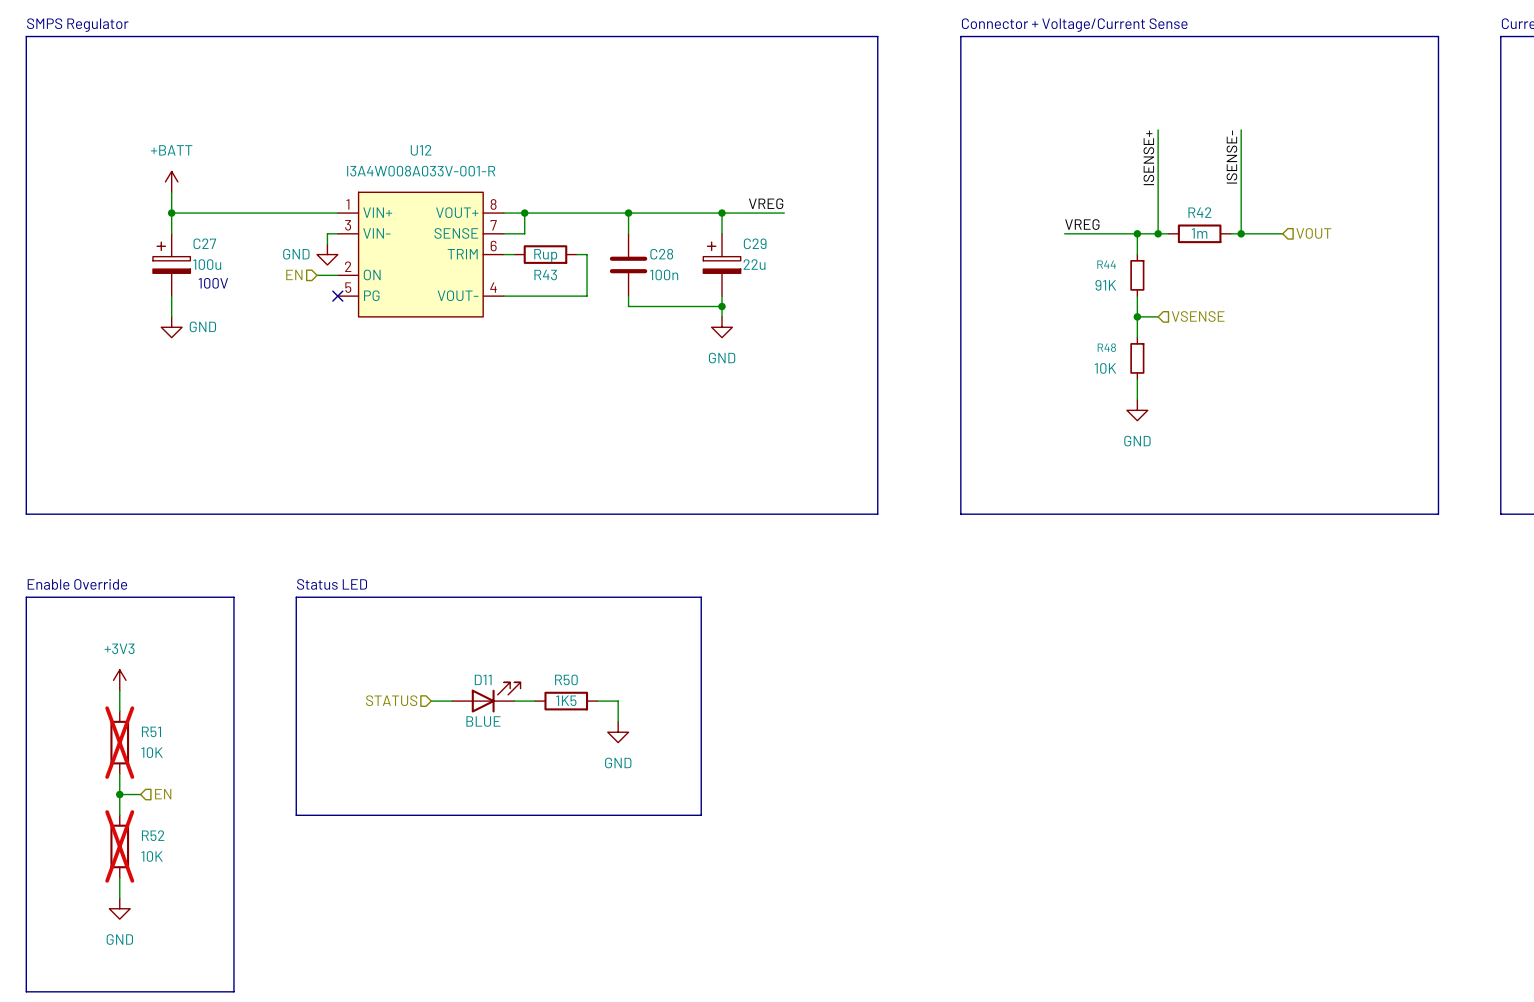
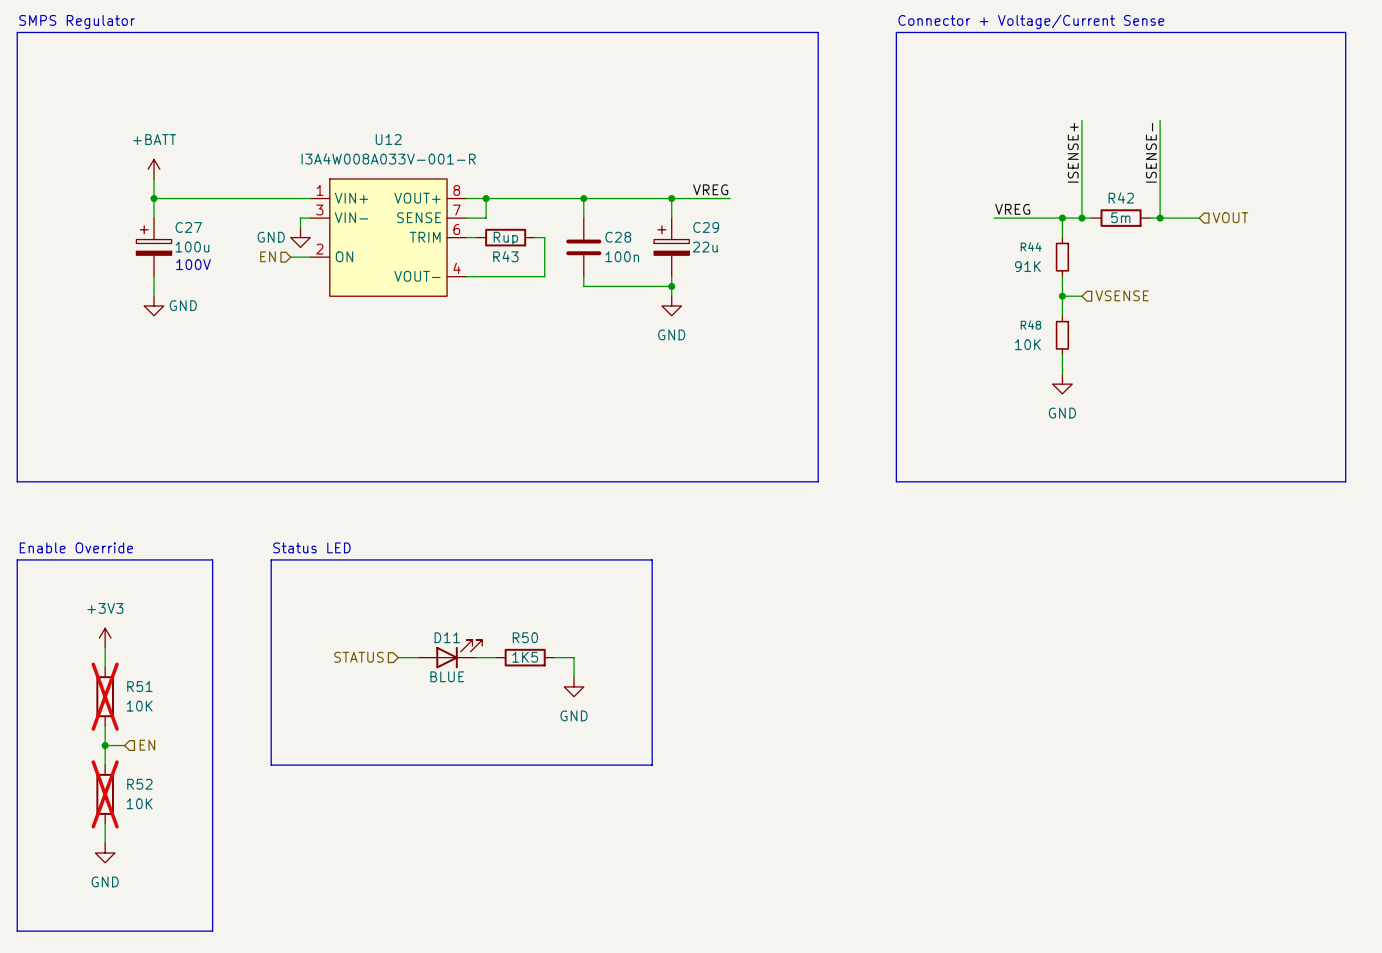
U12 symbol: [337, 192, 504, 317] -> [310, 179, 467, 297]
R42 value: 1m (1199, 233) -> 5m (1120, 217)
no-connect mark: (337, 296) -> none

